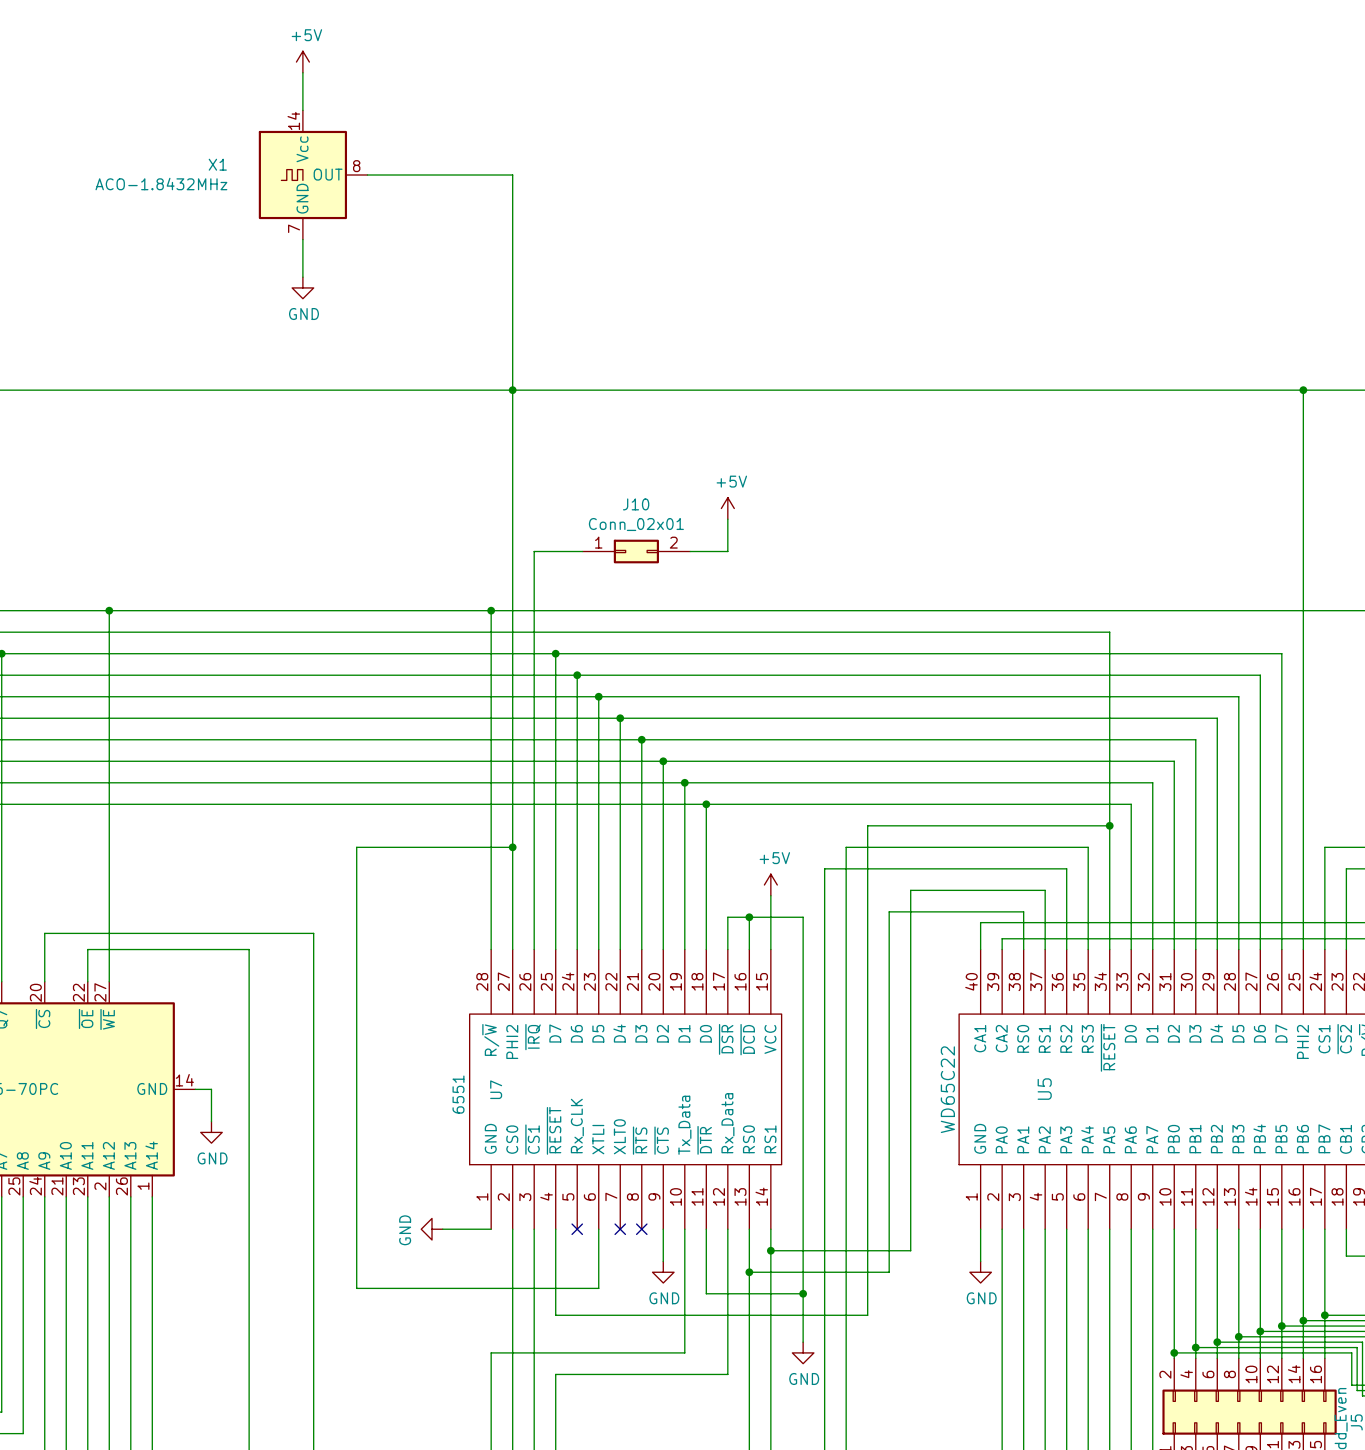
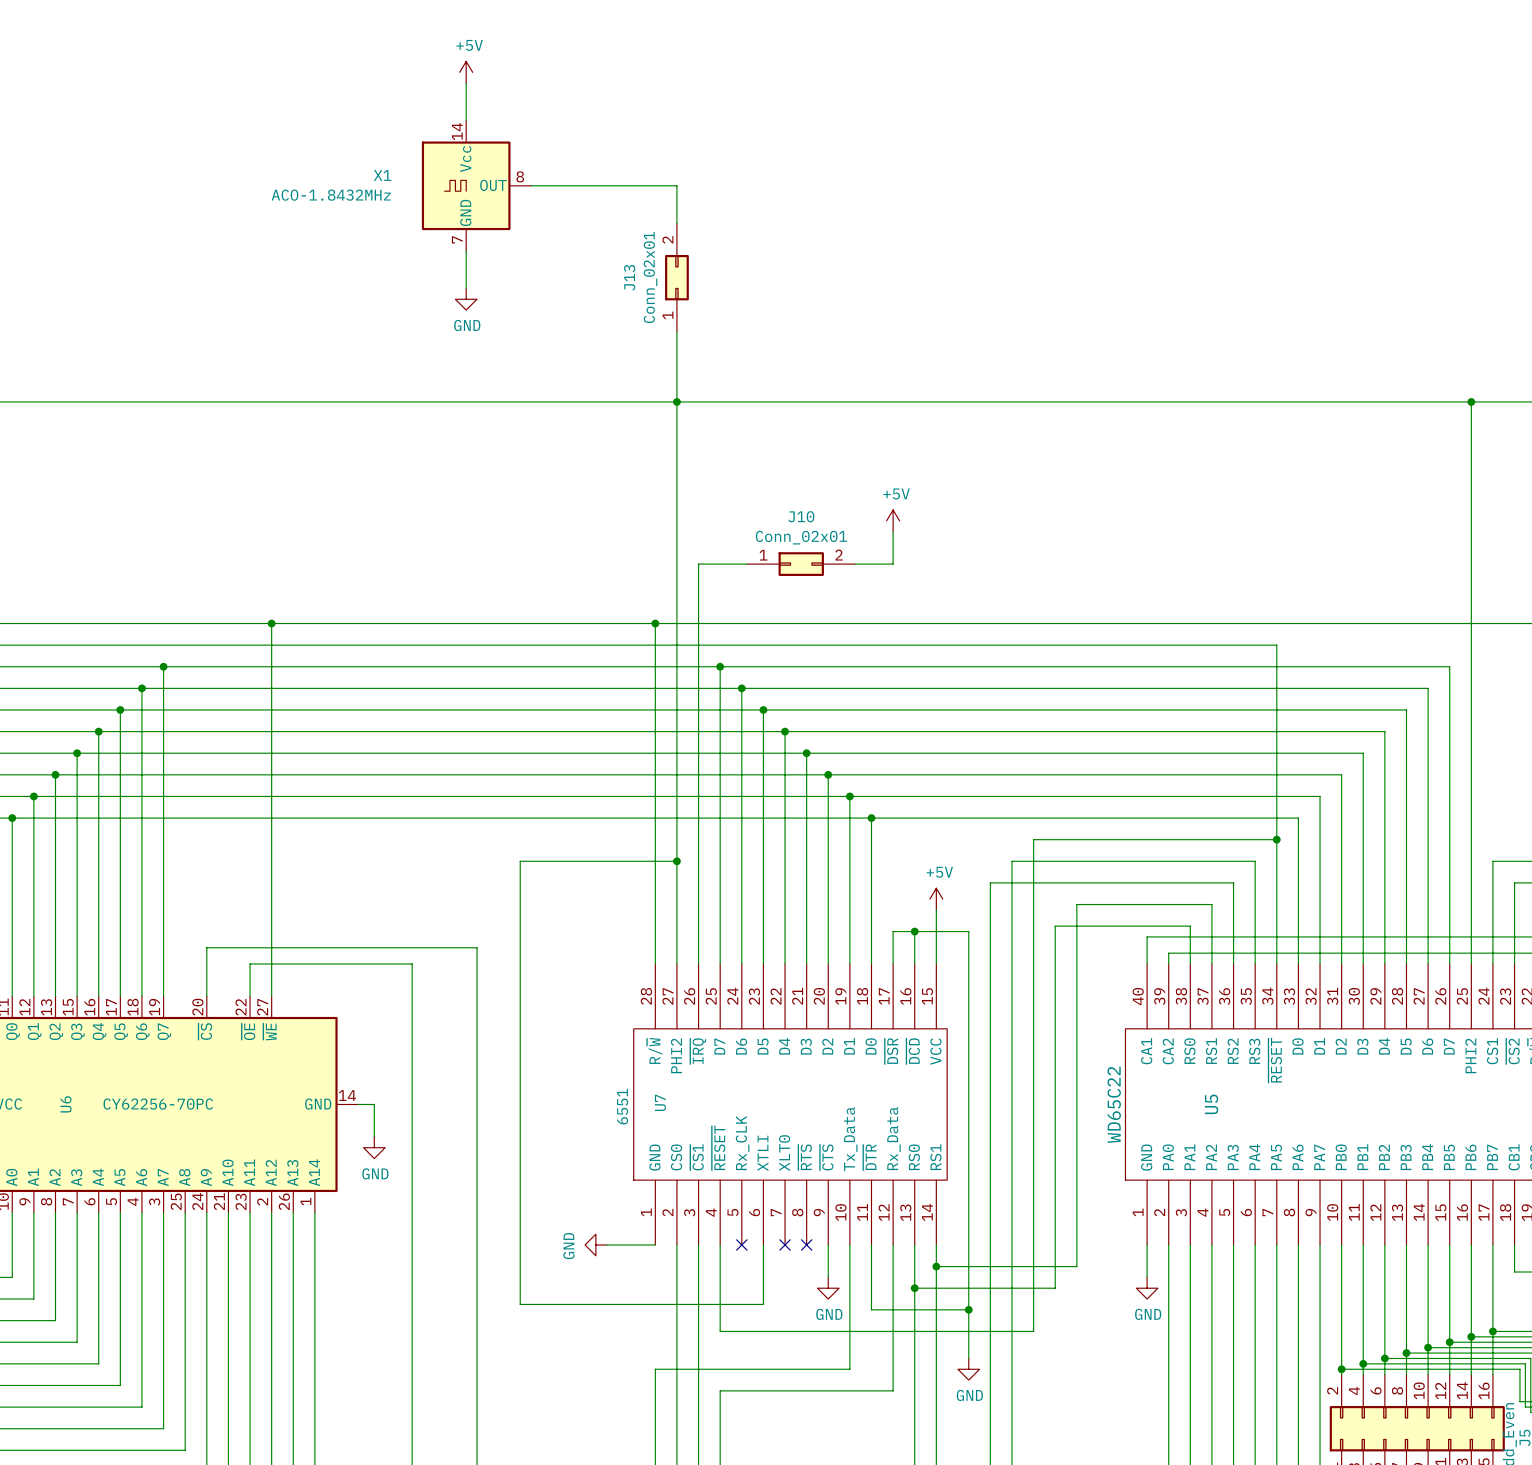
J13: none -> Conn_02x01 (676, 277)

